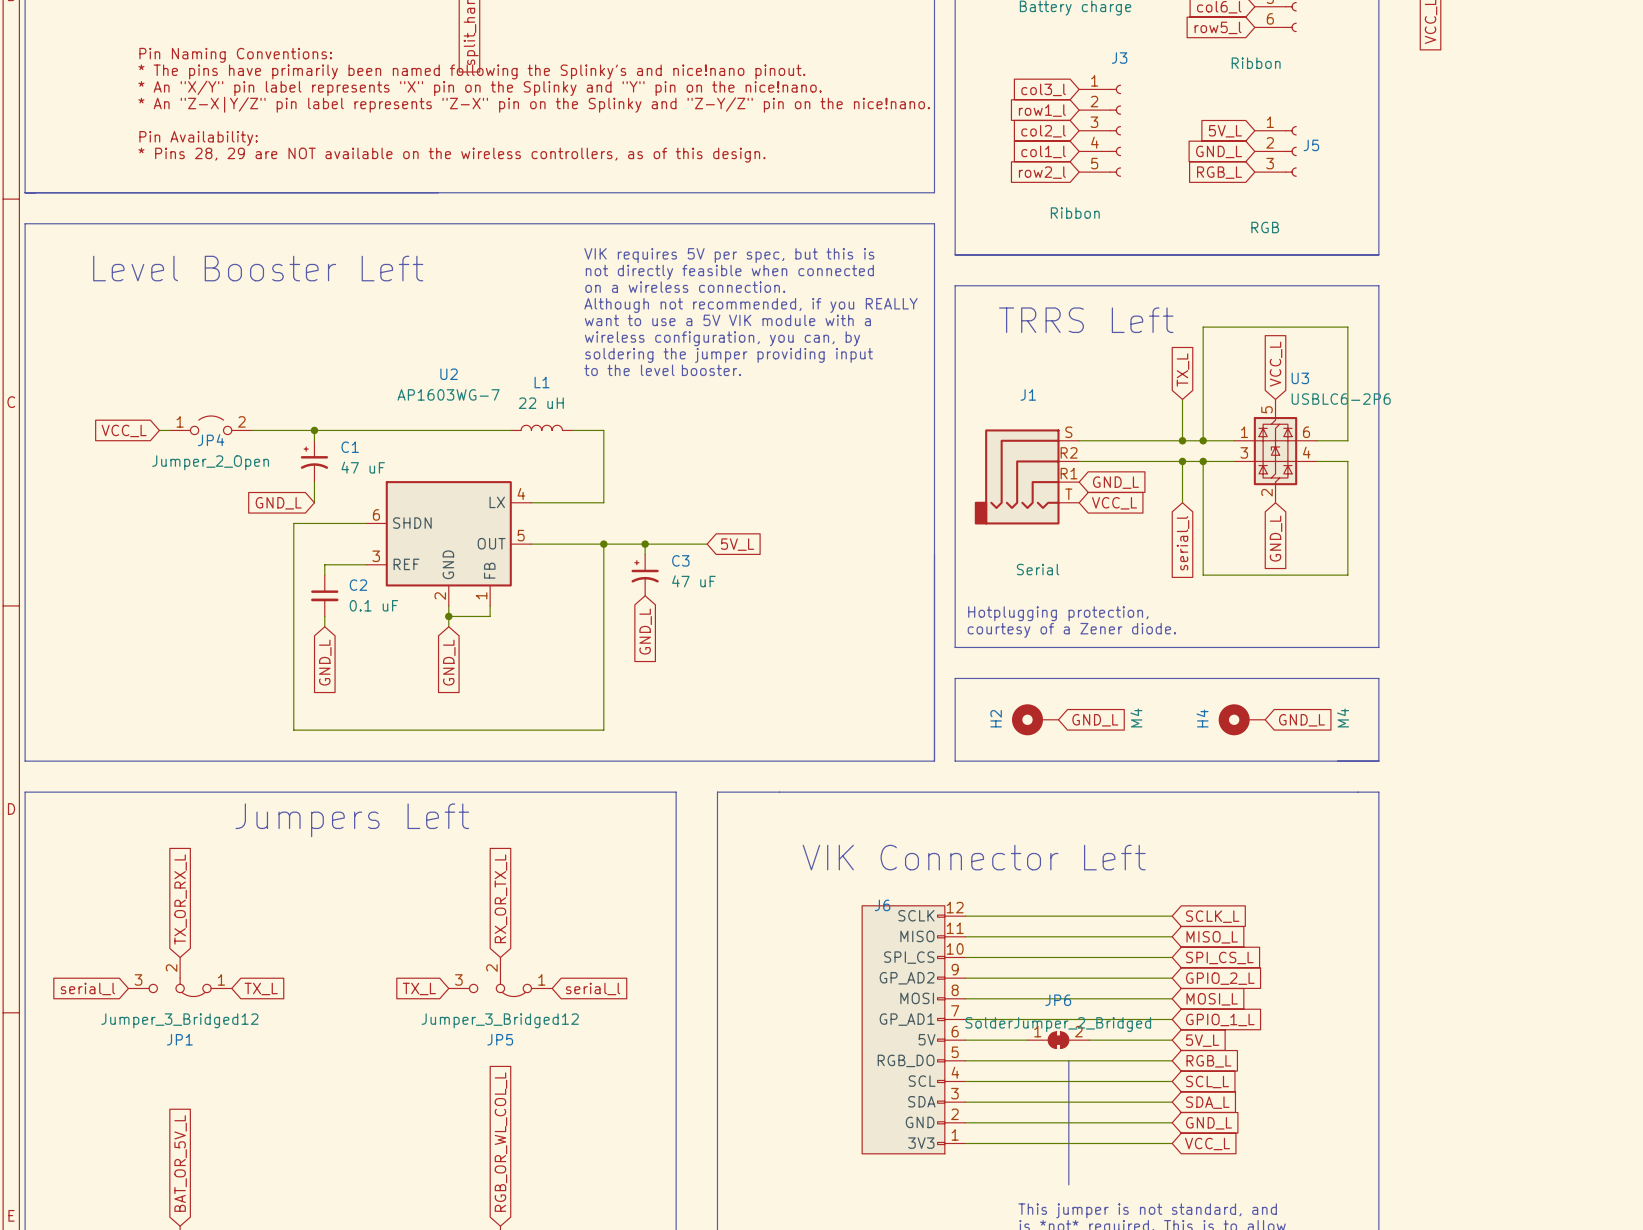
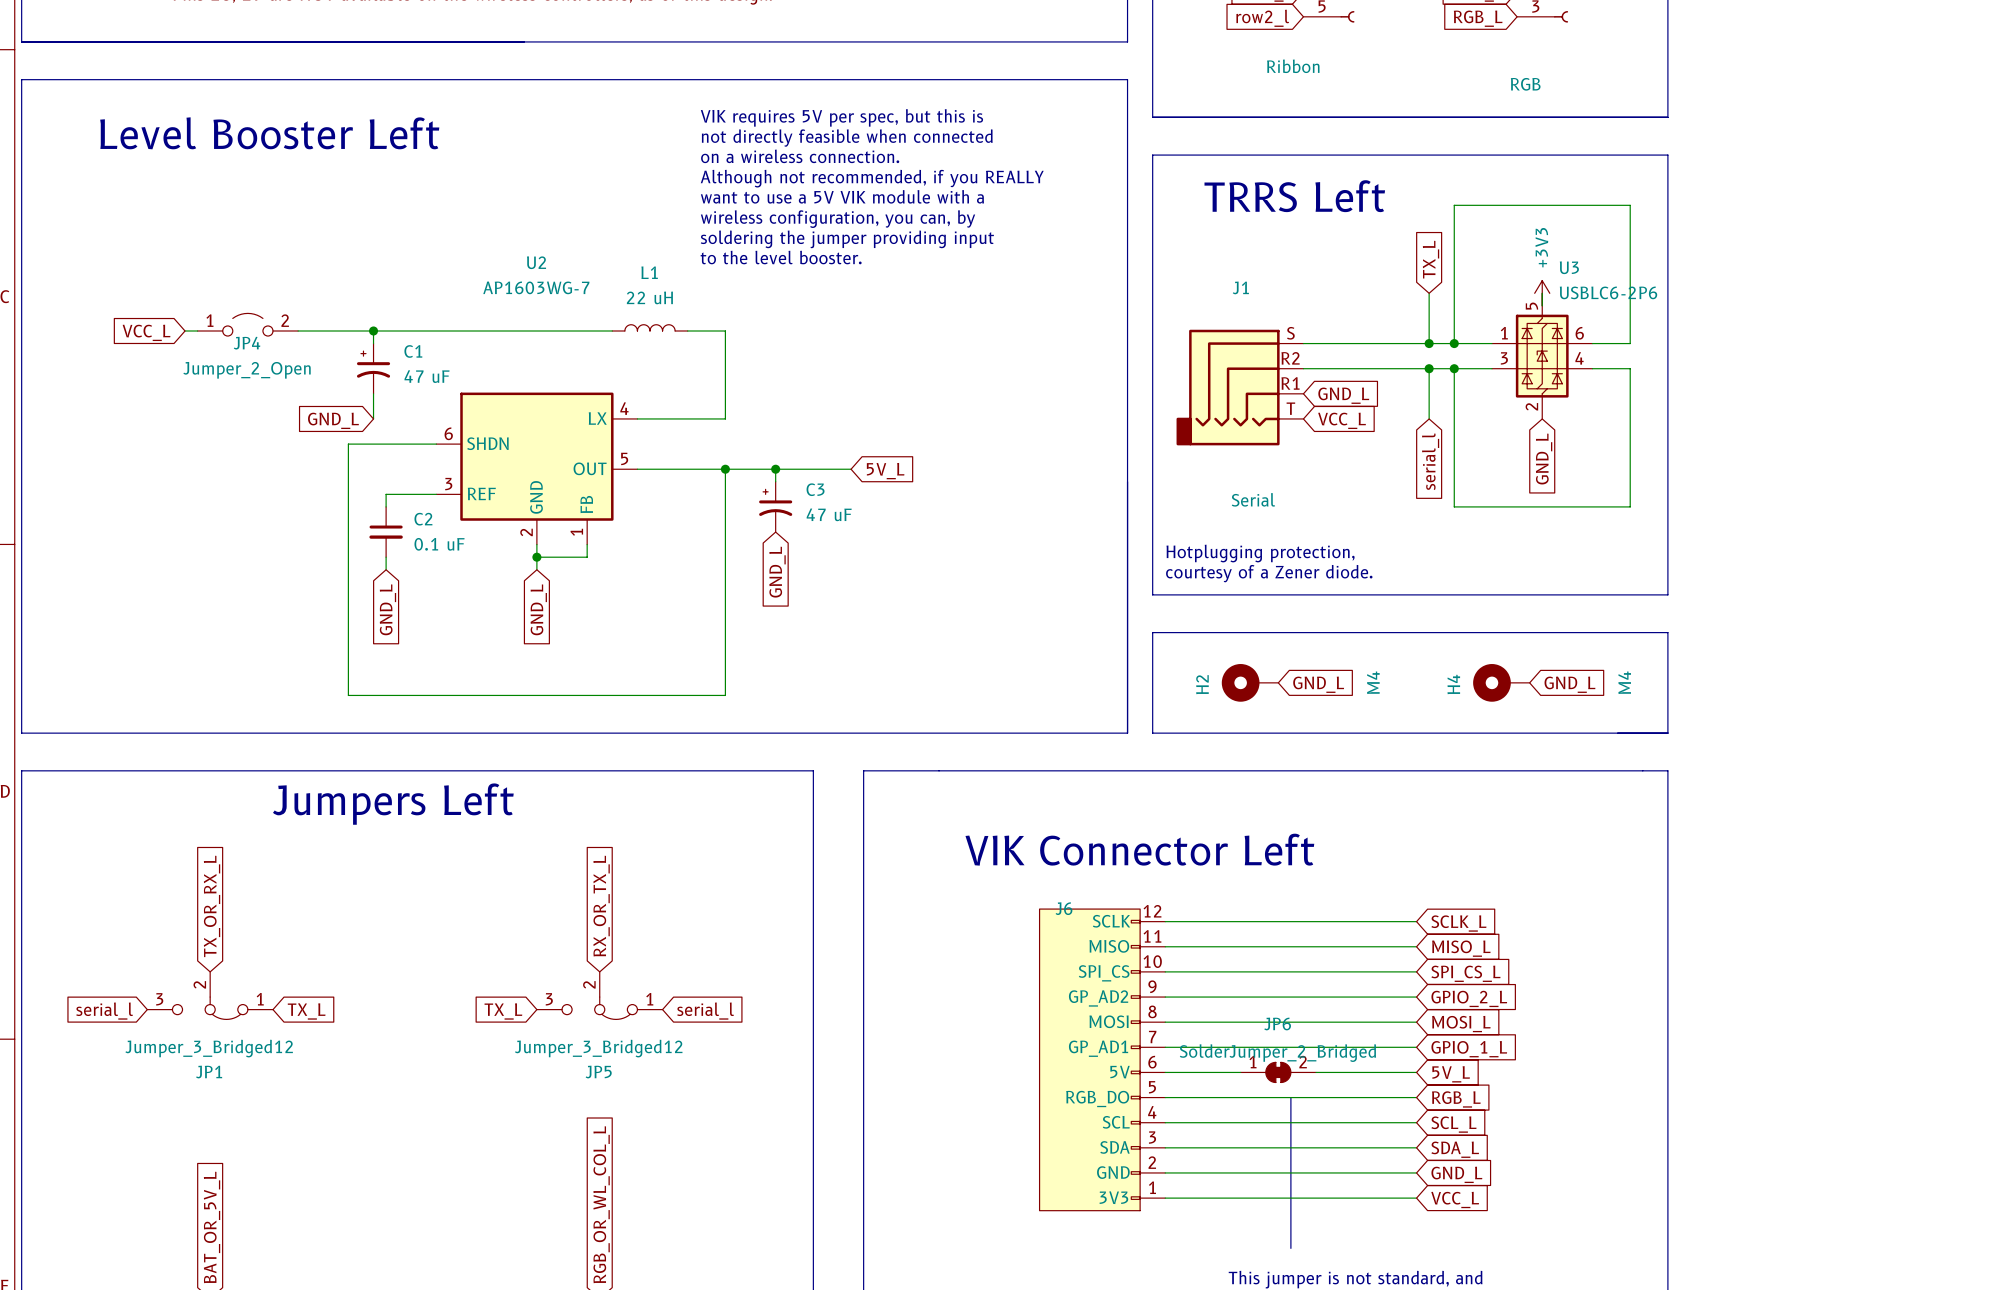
global label: VCC_L (1276, 364) -> none
power symbol: none -> +3V3 (1542, 293)

